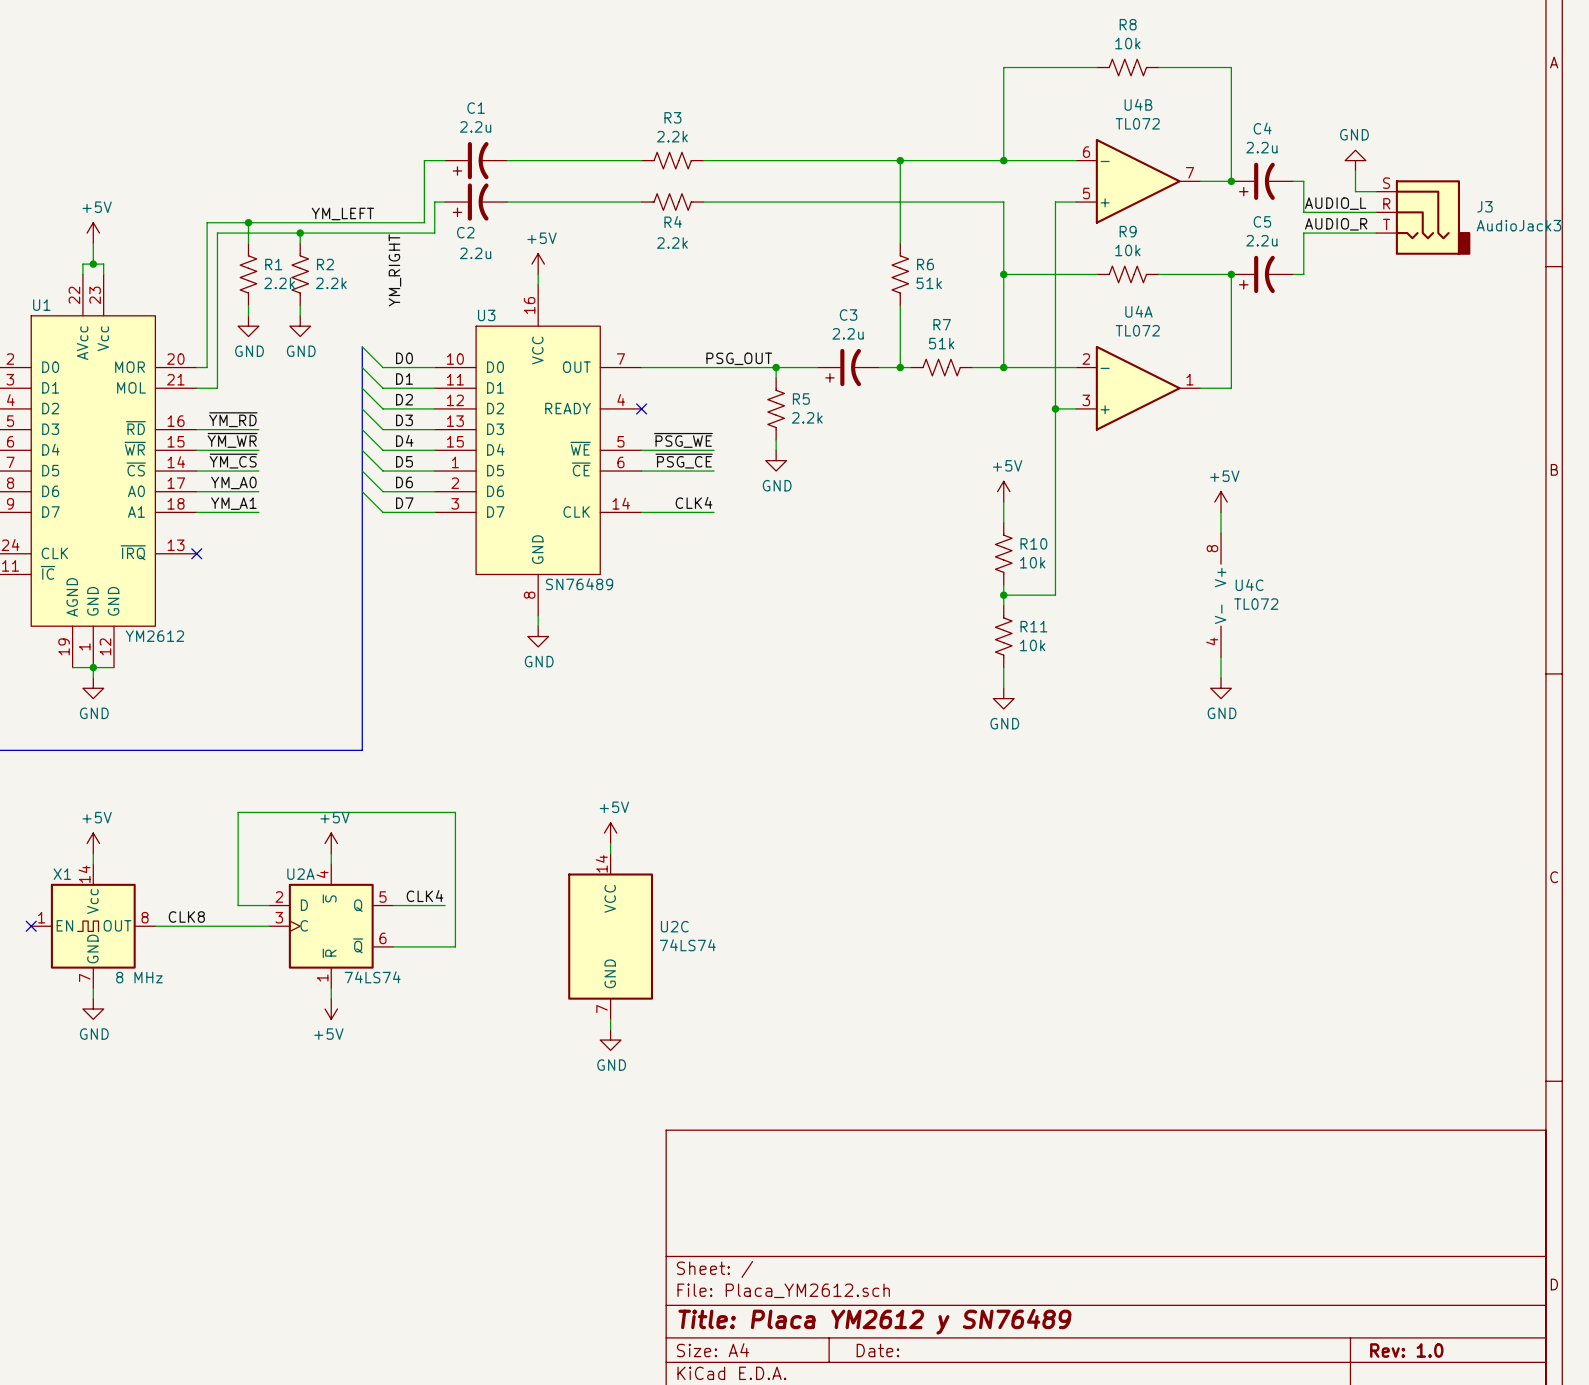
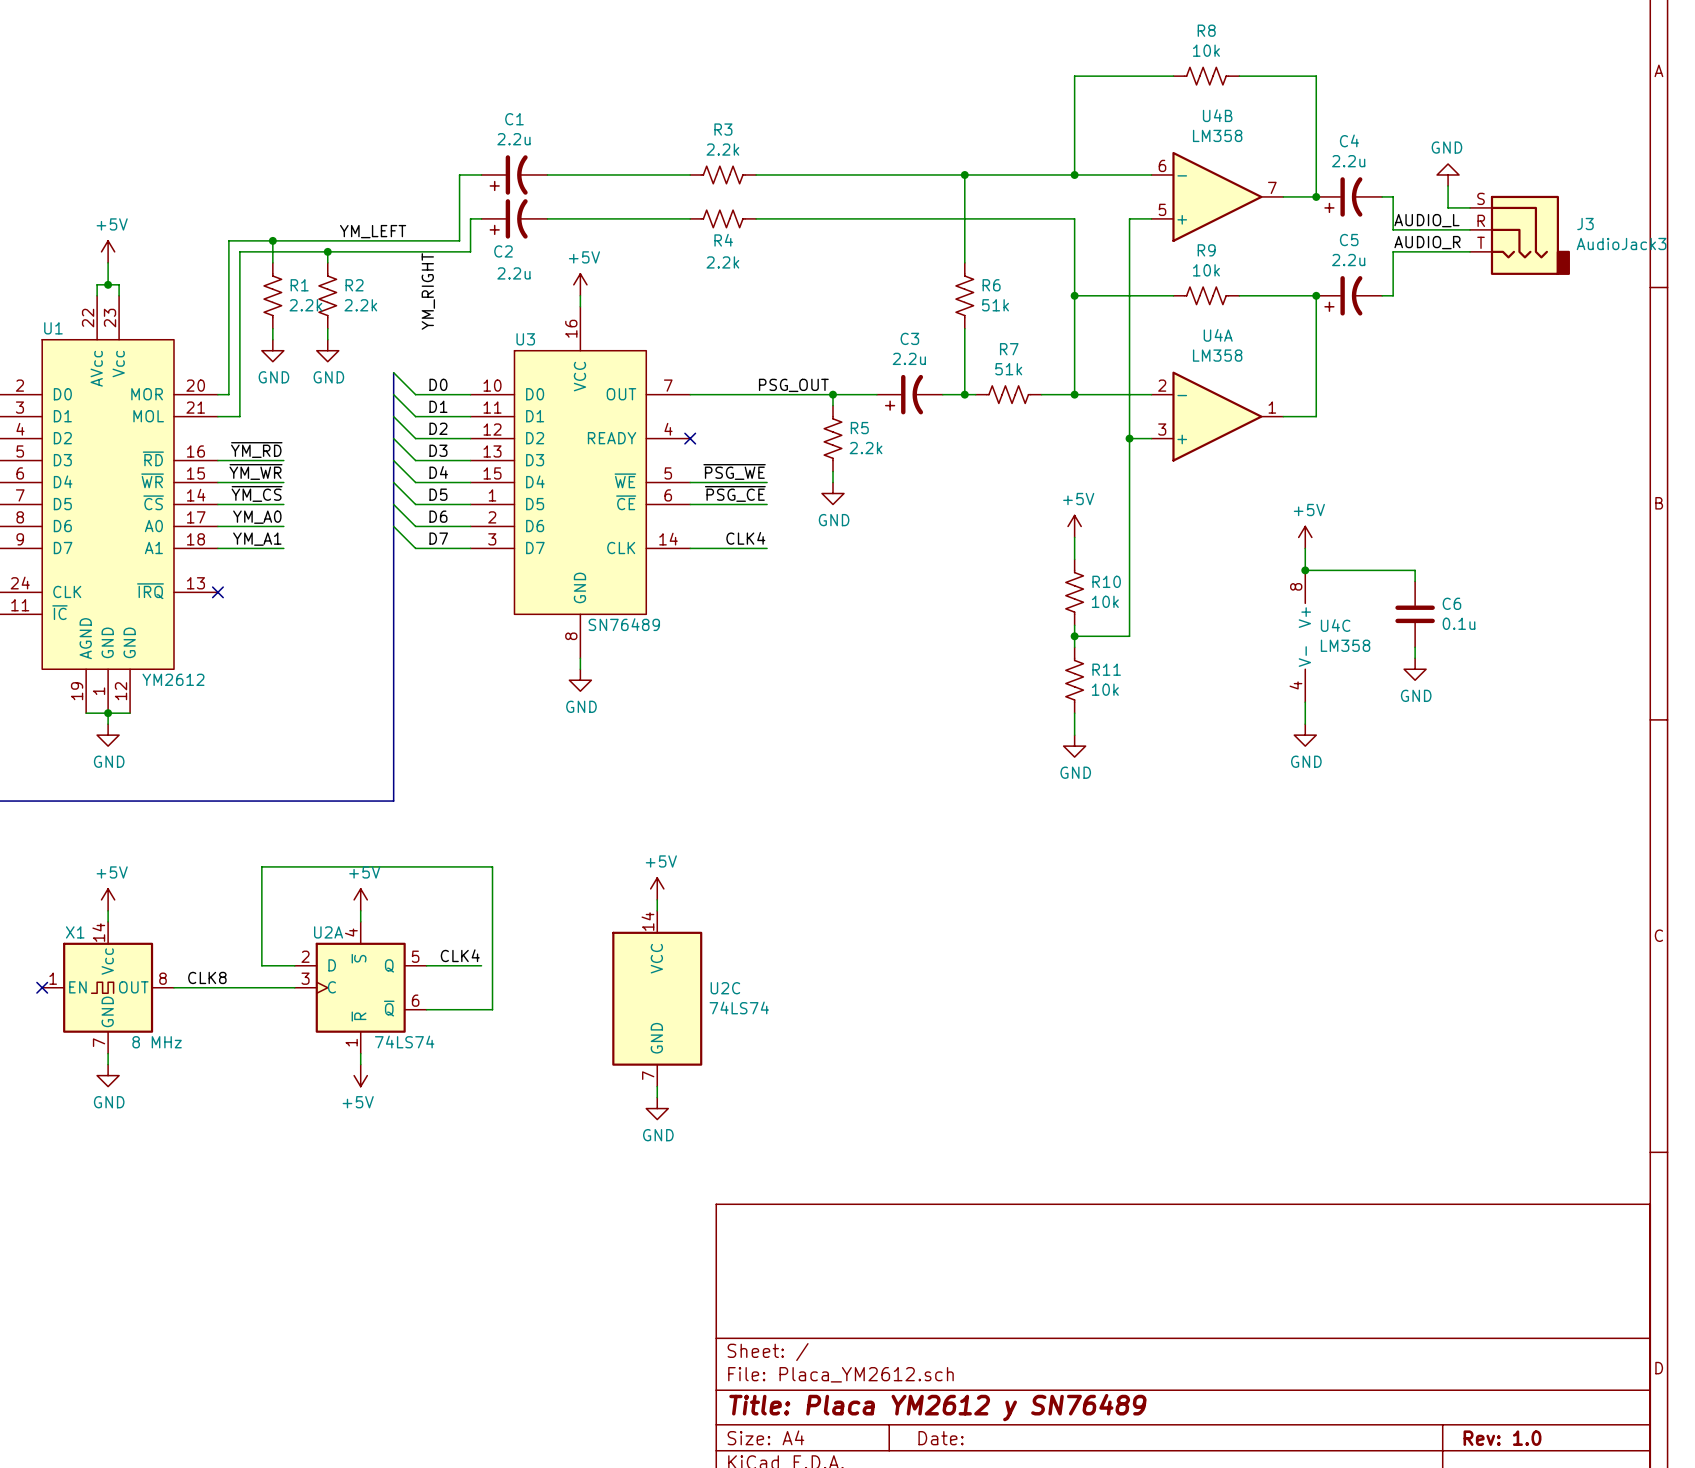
U4B value: TL072 (1137, 123) -> LM358 (1217, 135)
U4A value: TL072 (1137, 330) -> LM358 (1217, 355)
wire: none -> (1305, 570) (1415, 570) (1415, 581)
junction: none -> (1305, 570)
C6: none -> 0.1u (1415, 614)
U4C value: TL072 (1256, 604) -> LM358 (1345, 645)
wire: none -> (1415, 647) (1415, 658)
power symbol: none -> GND (1415, 669)

